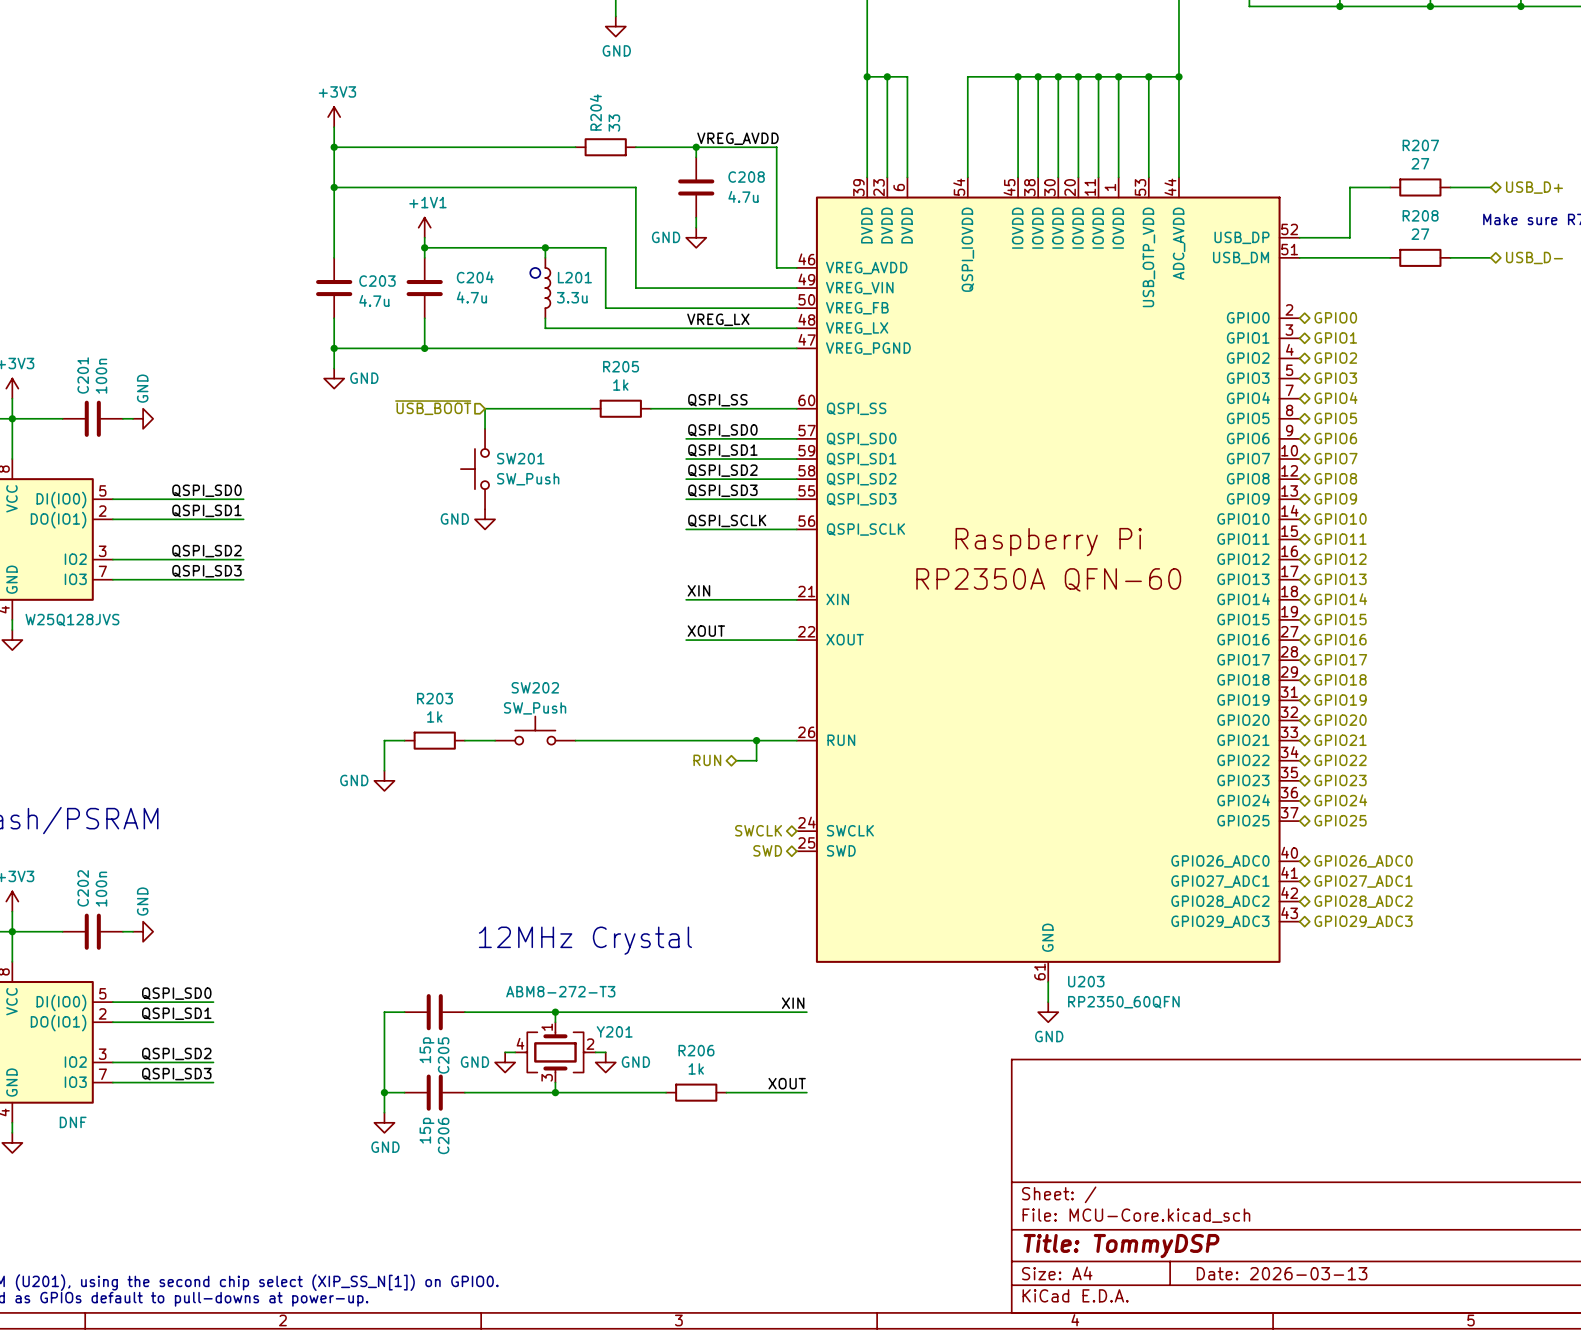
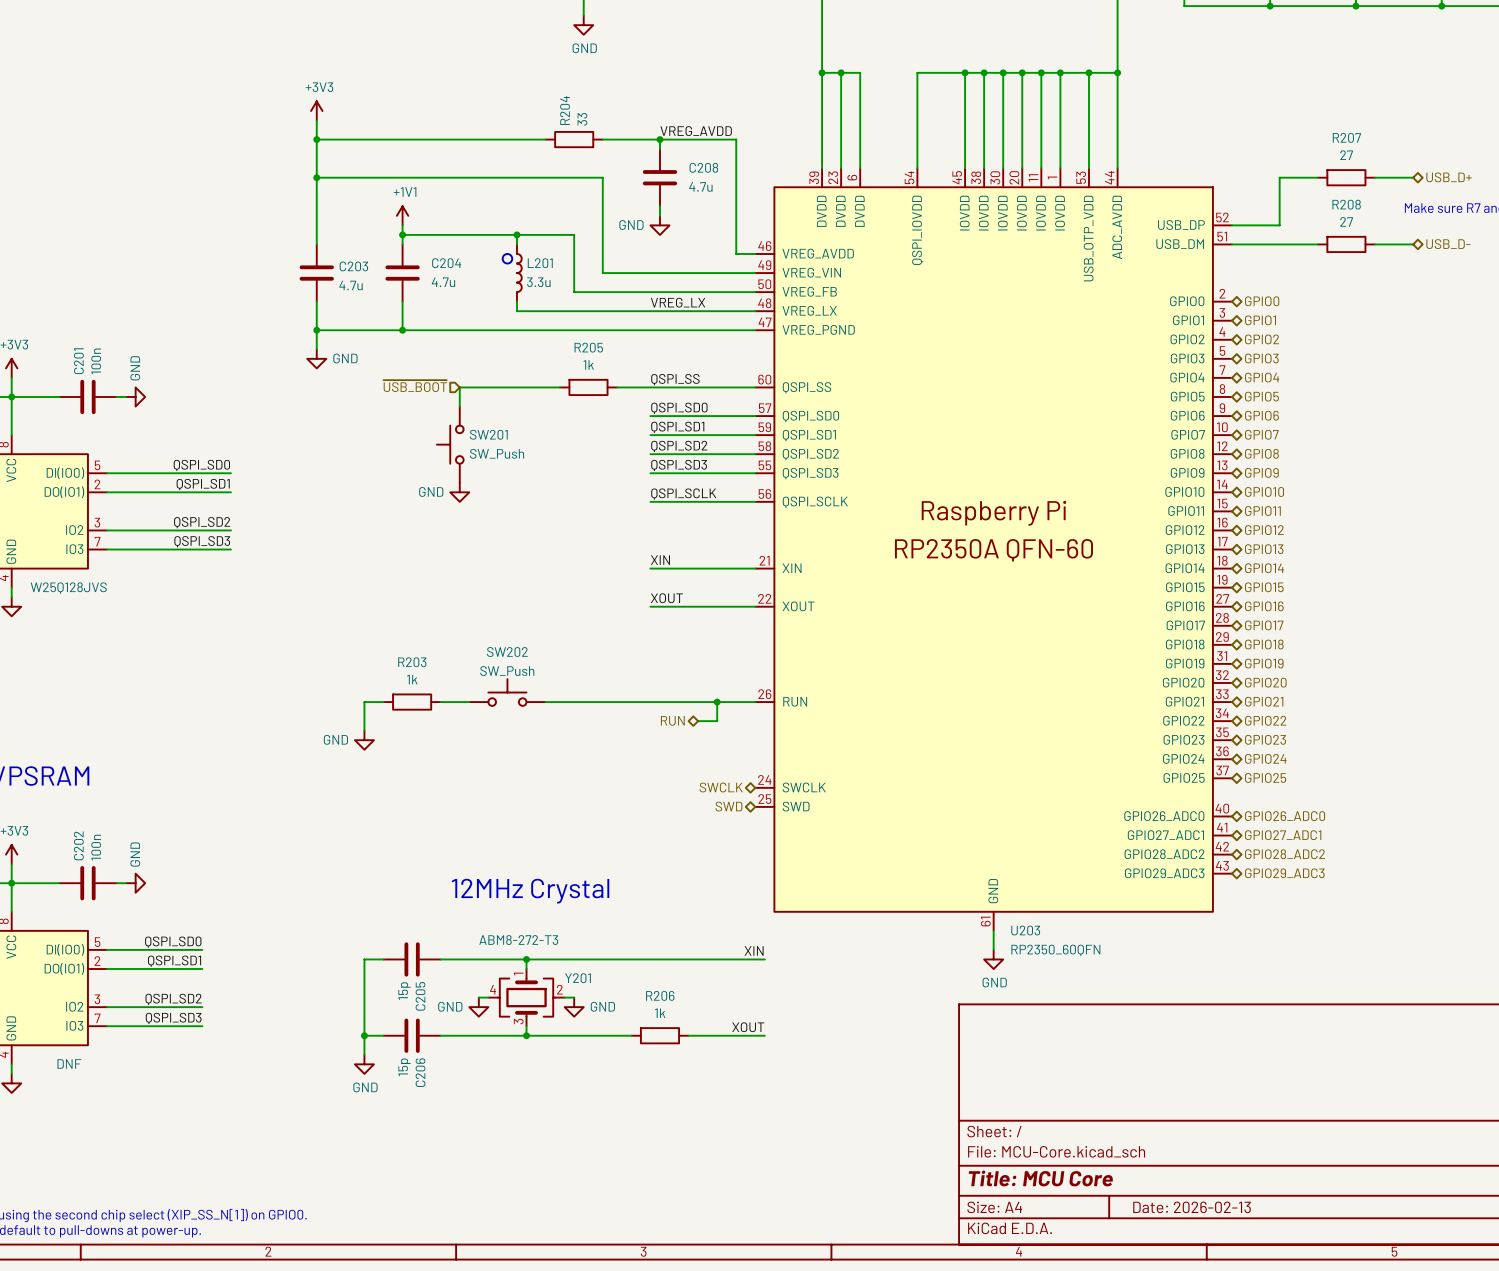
title block: Title: TommyDSP (1121, 1246) -> Title: MCU Core (1040, 1178)
title block: Date: 2026-03-13 (1282, 1273) -> Date: 2026-02-13 (1192, 1207)

